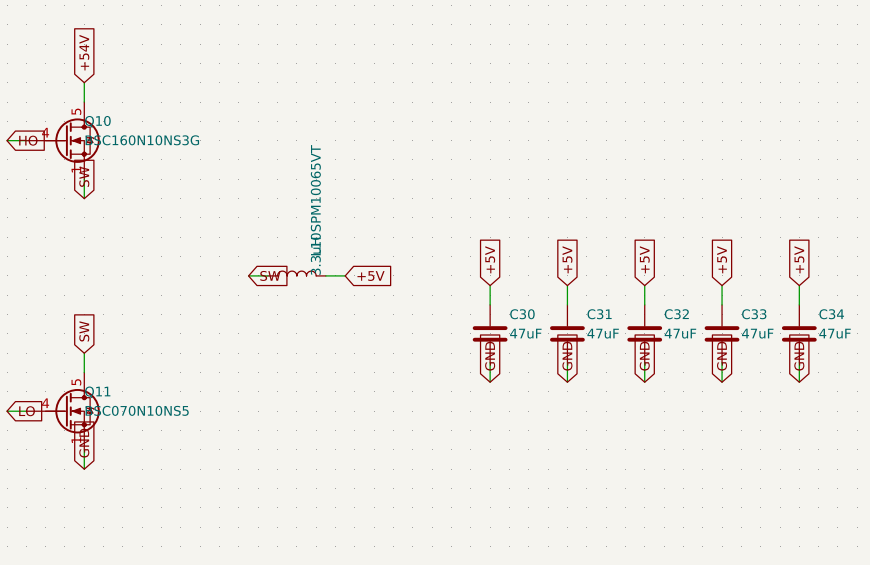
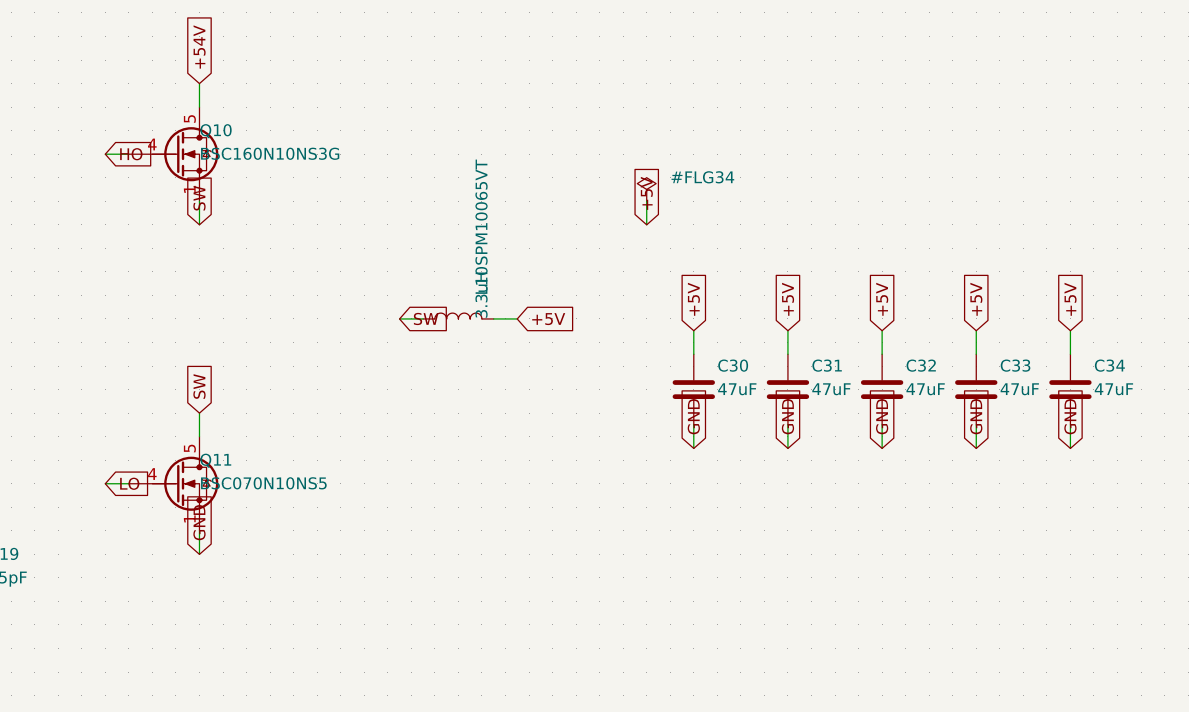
#FLG34: none -> (646, 189)
global label: none -> +5V (646, 193)
wire: none -> (646, 201) (646, 224)

